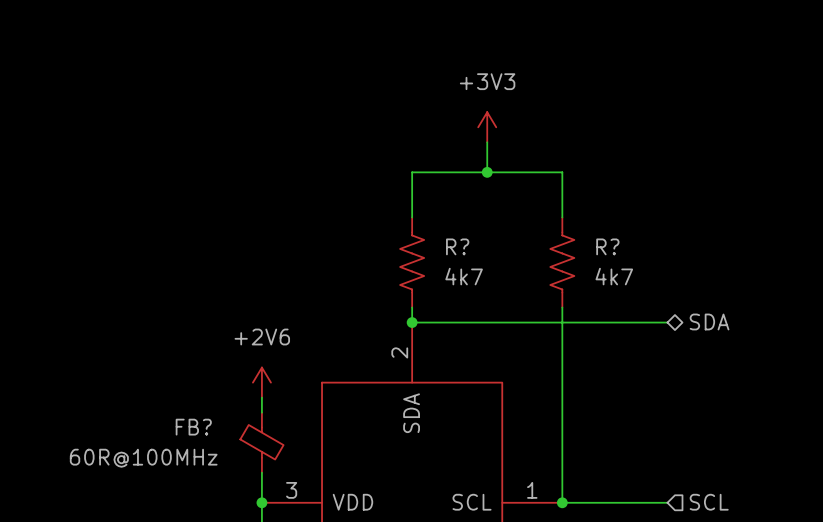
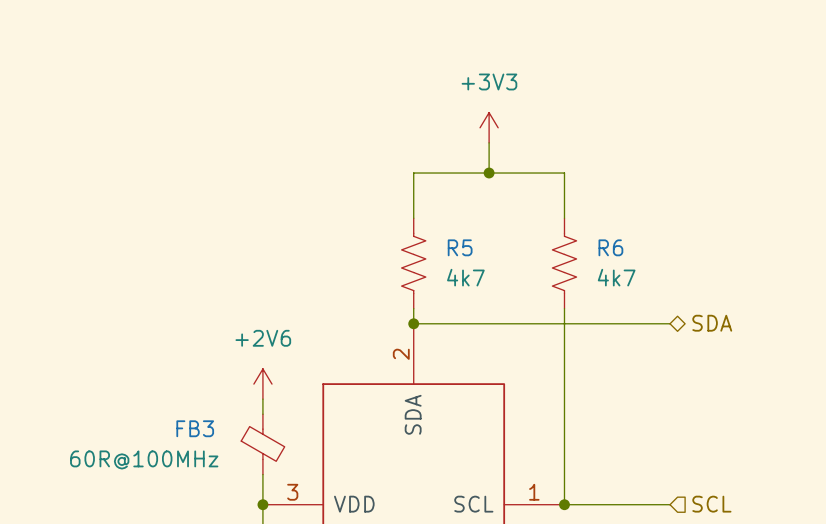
R? name: R? (457, 246) -> R5 (460, 247)
R? name: R? (607, 246) -> R6 (610, 247)
FB? name: FB? (193, 427) -> FB3 (195, 428)

